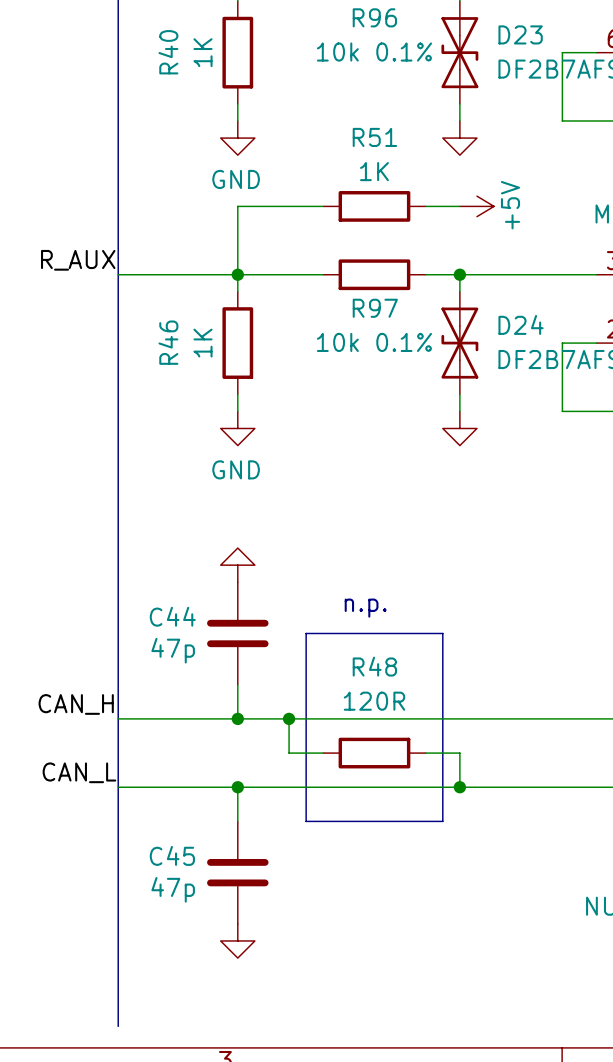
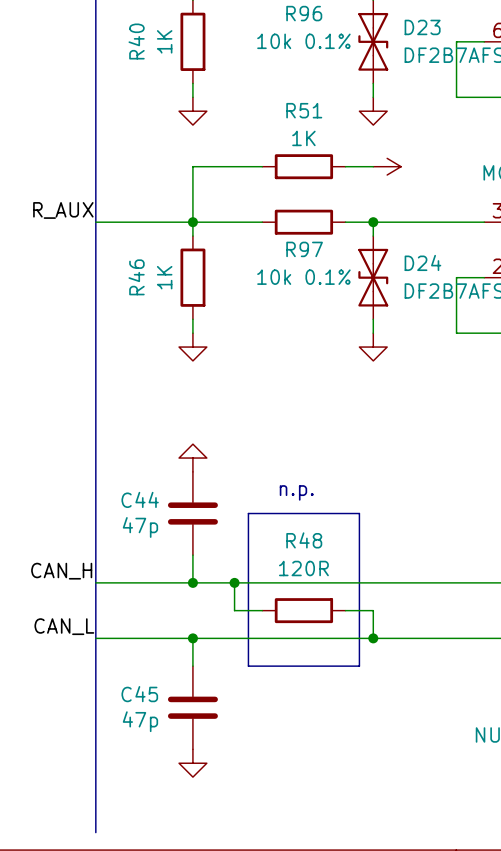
power symbol text: GND (236, 179) -> none
power symbol text: +5V (510, 205) -> none
power symbol text: GND (236, 469) -> none

